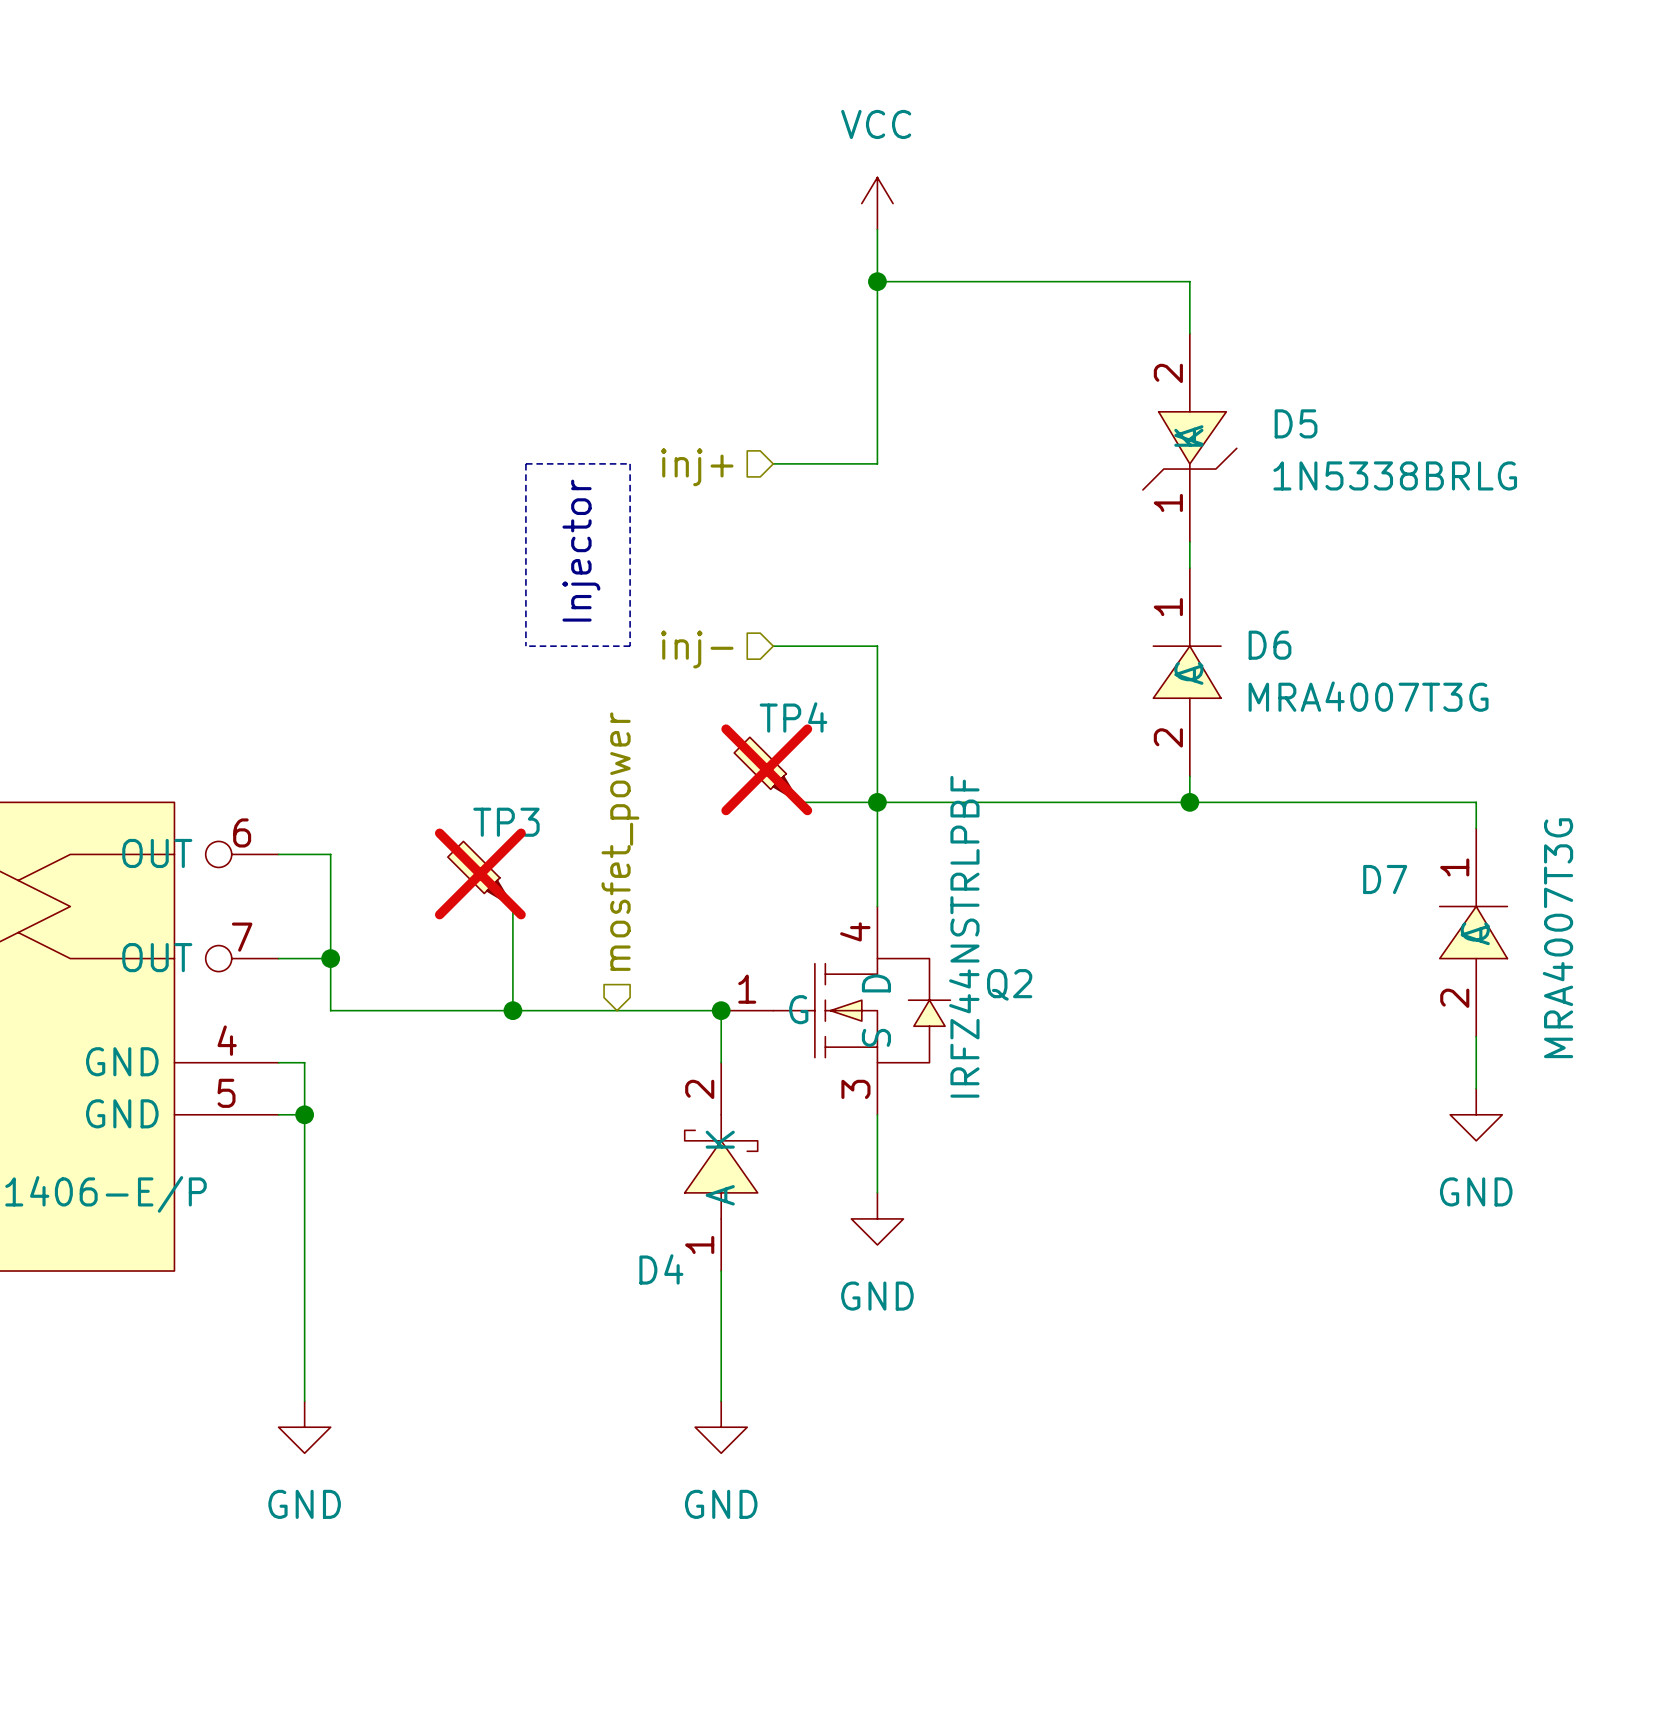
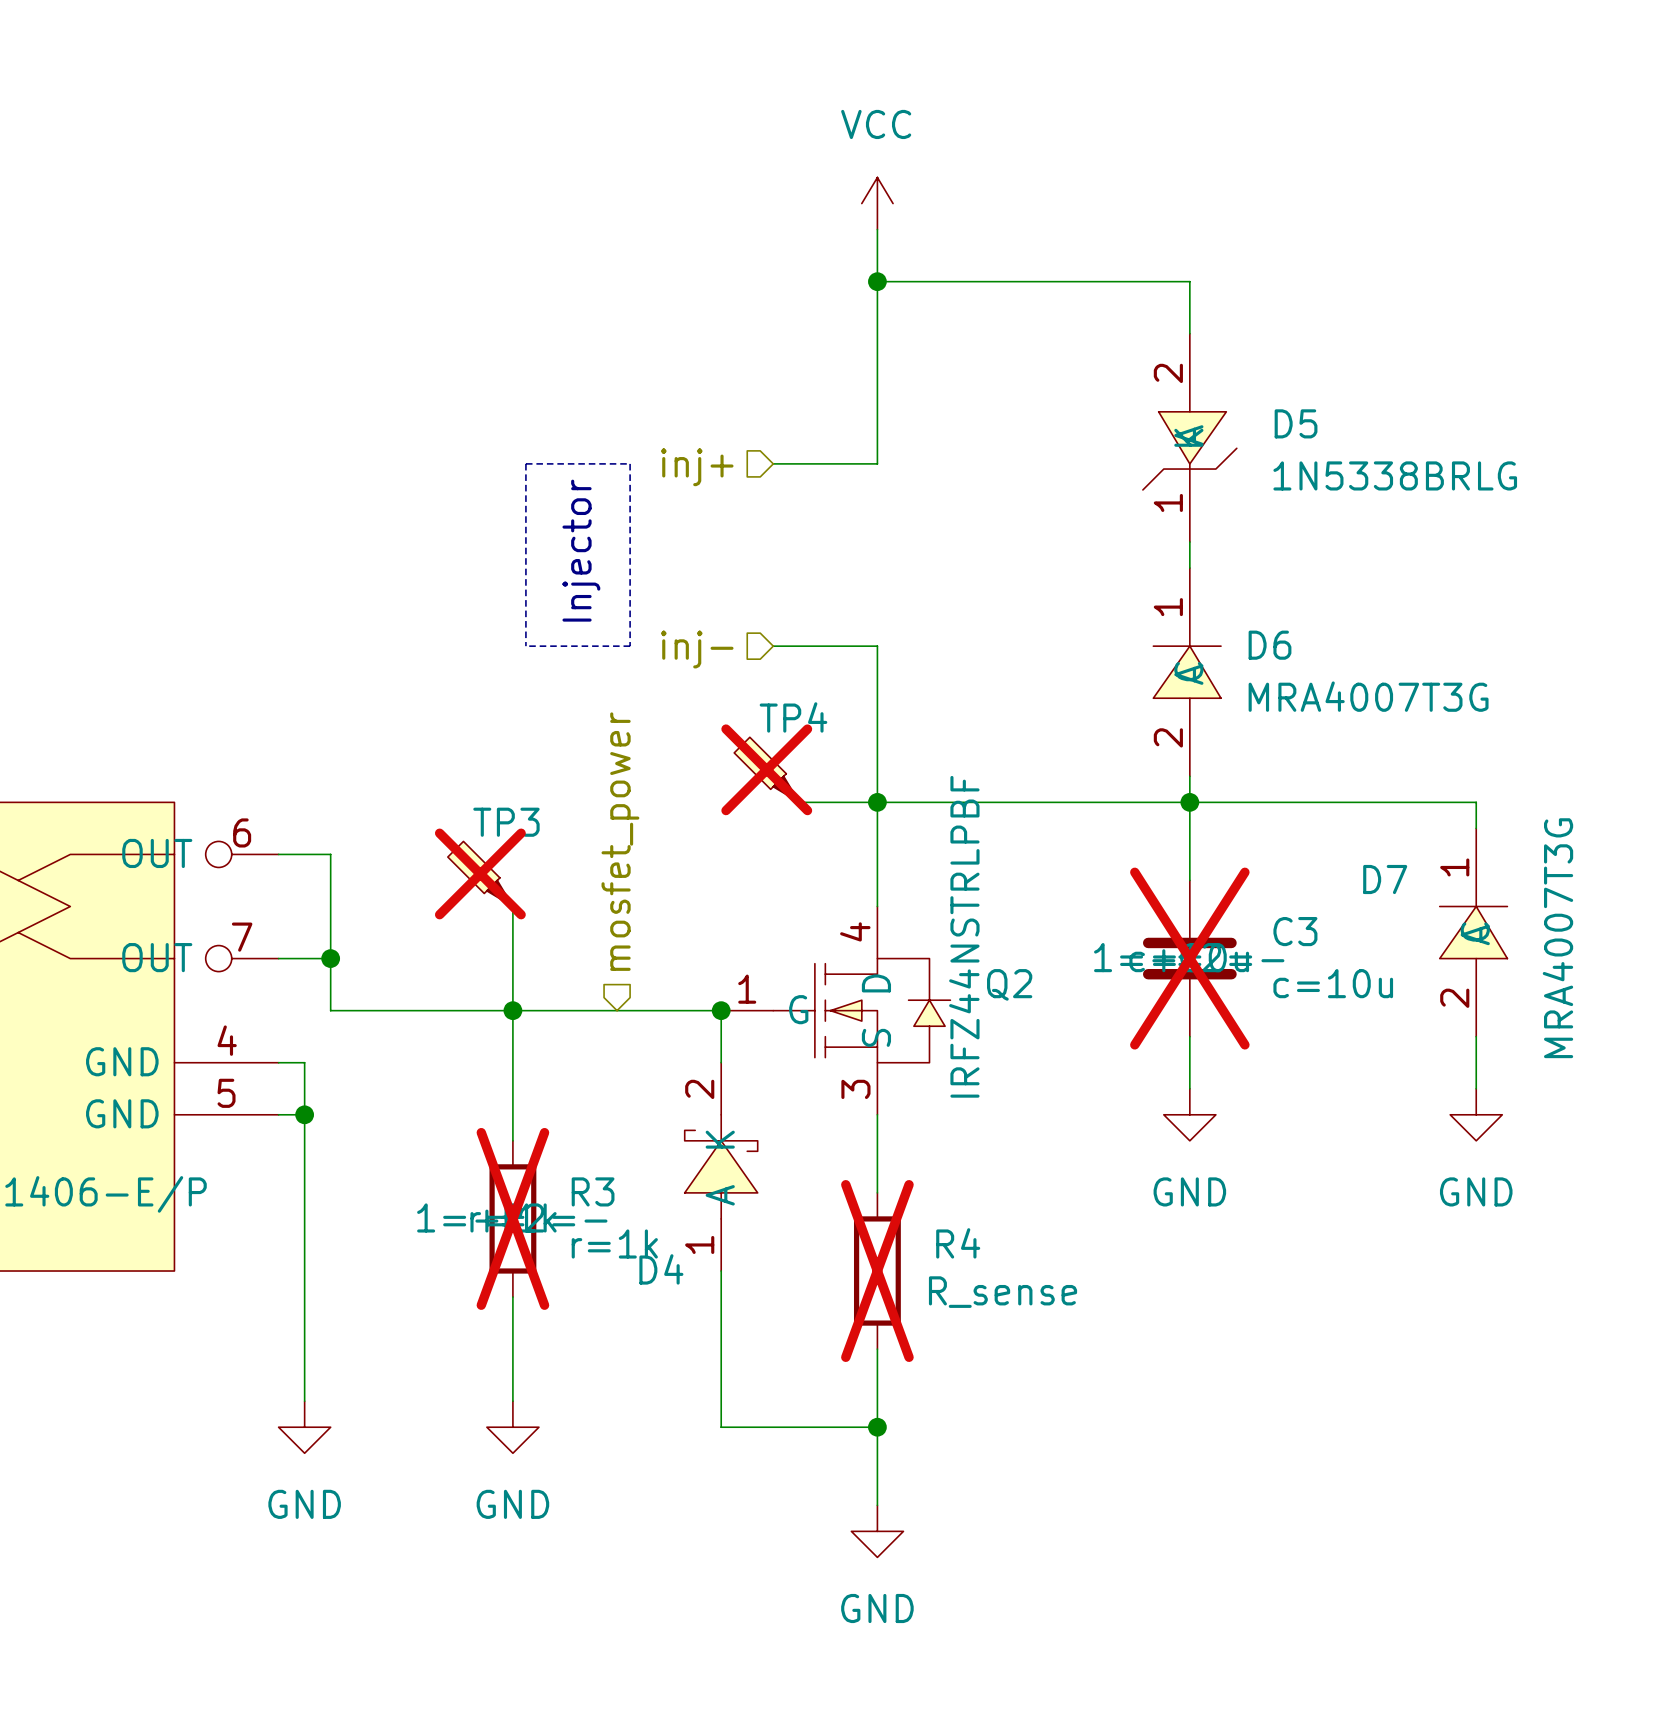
wire: none -> (1189, 802) (1189, 880)
C3: none -> c=10u (1189, 958)
wire: none -> (512, 1010) (512, 1140)
wire: none -> (1189, 1036) (1189, 1088)
power symbol: none -> GND (1189, 1114)
R3: none -> r=1k (512, 1218)
power symbol: GND (877, 1218) -> none
R4: none -> (877, 1271)
wire: none -> (512, 1297) (512, 1401)
wire: none -> (877, 1349) (877, 1505)
wire: none -> (721, 1401) (721, 1427) (877, 1427)
power symbol: none -> GND (512, 1427)
power symbol: GND (721, 1427) -> none
junction: none -> (877, 1427)
power symbol: none -> GND (877, 1531)

